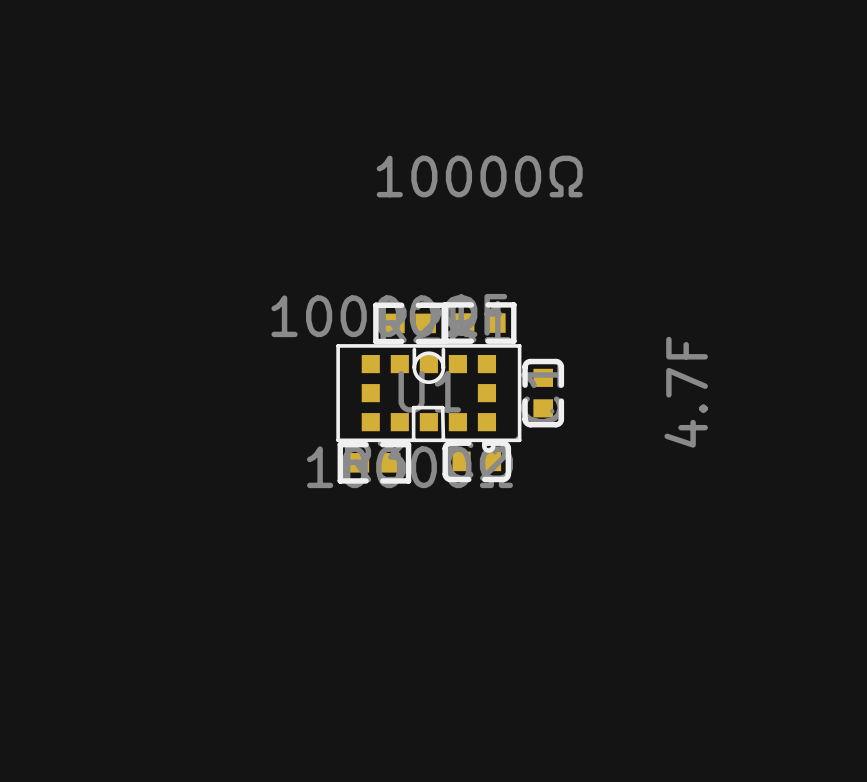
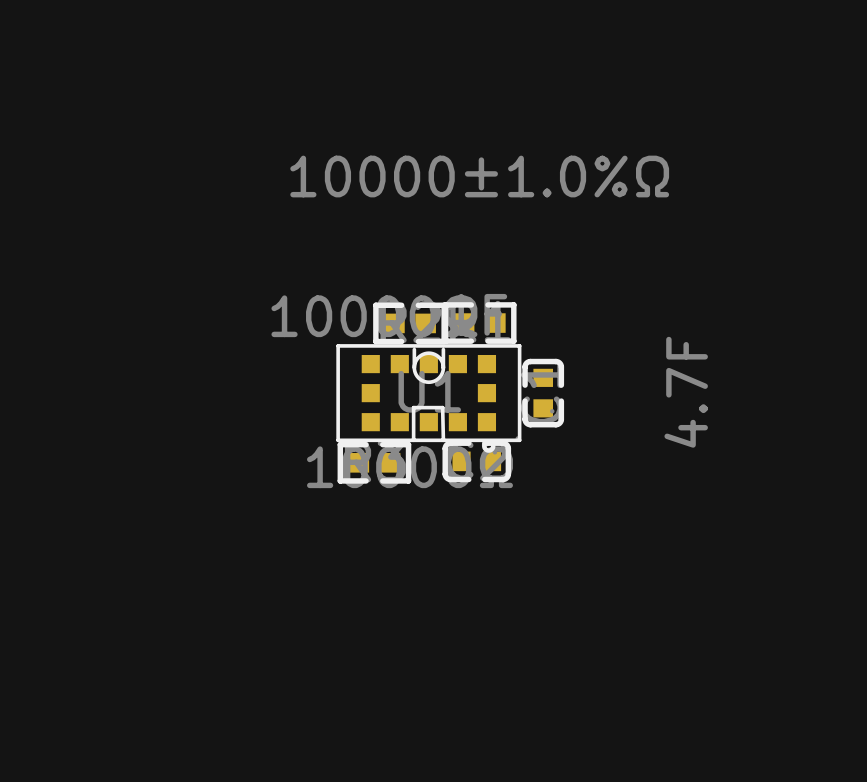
part value: 10000Ω (479, 176) -> 10000±1.0%Ω (479, 176)

